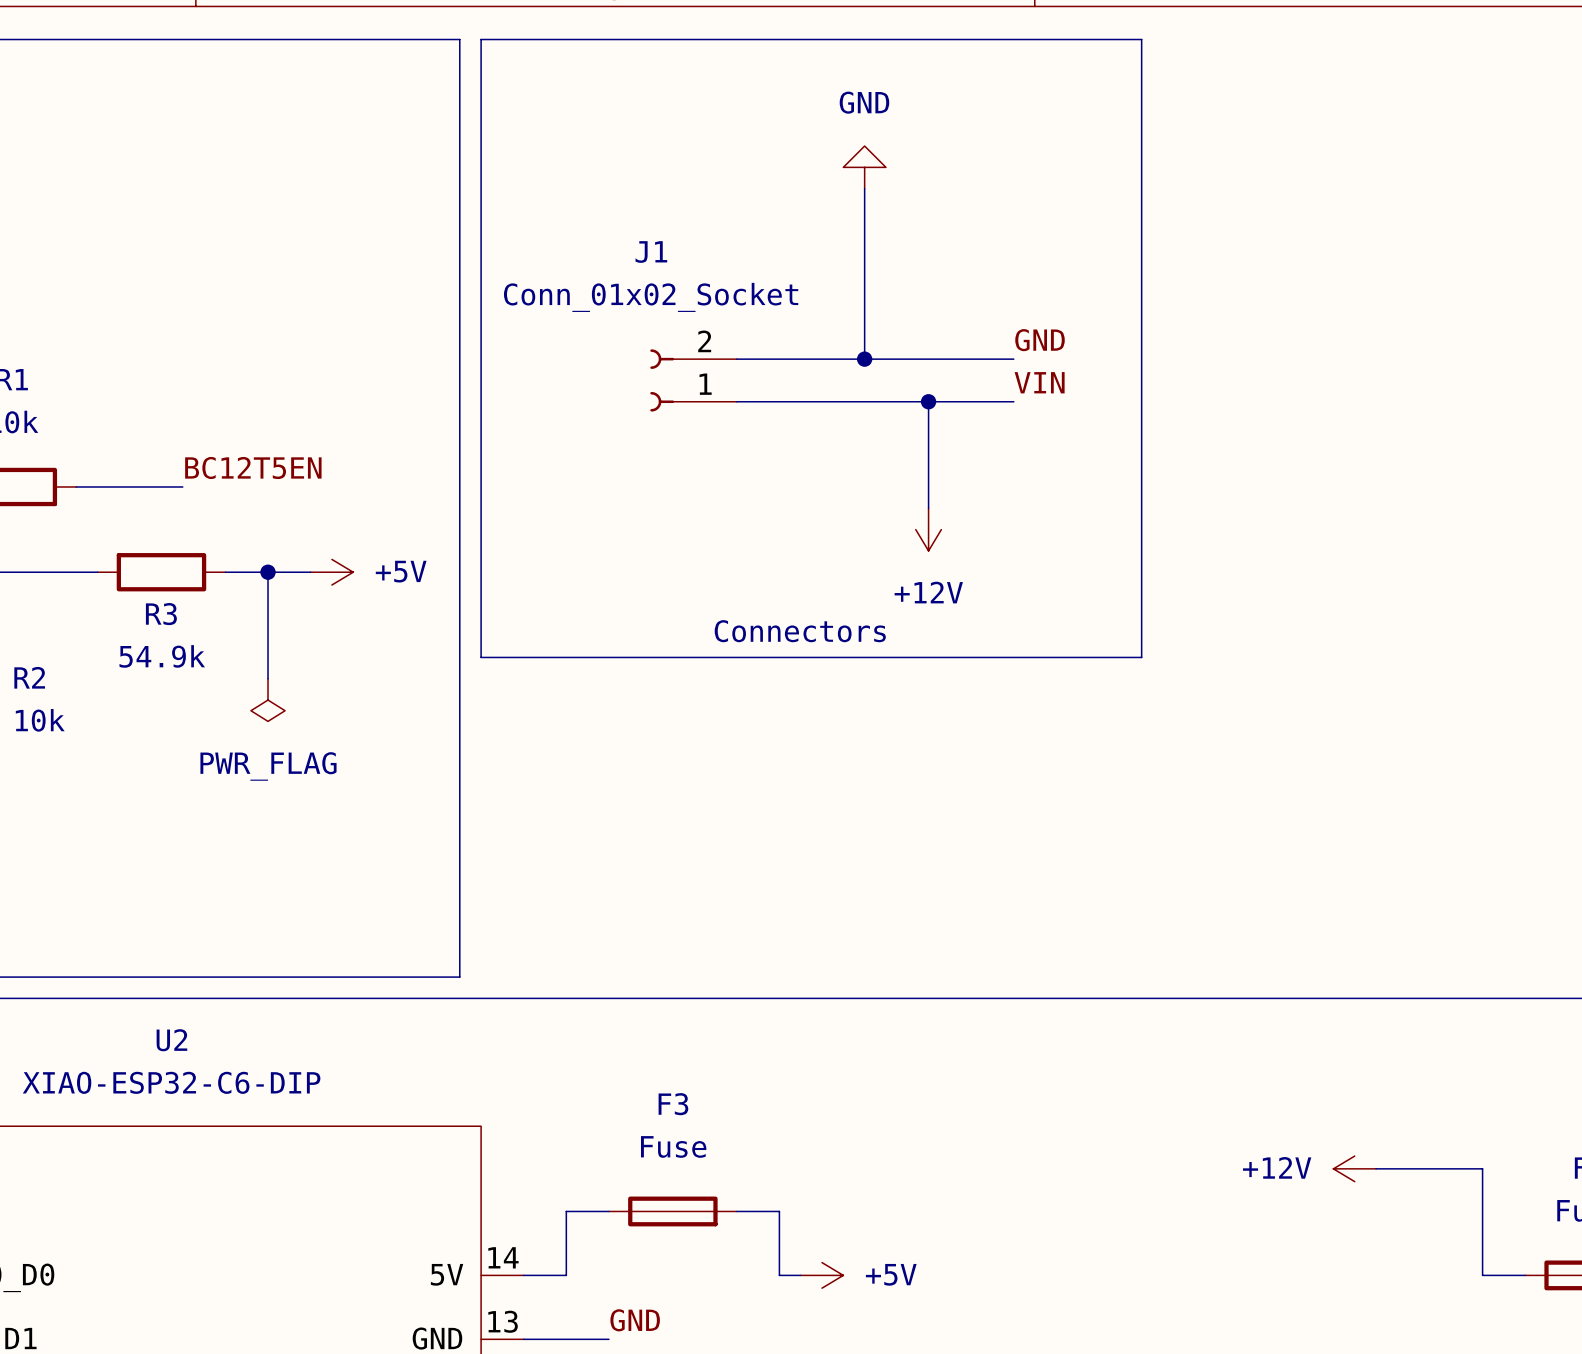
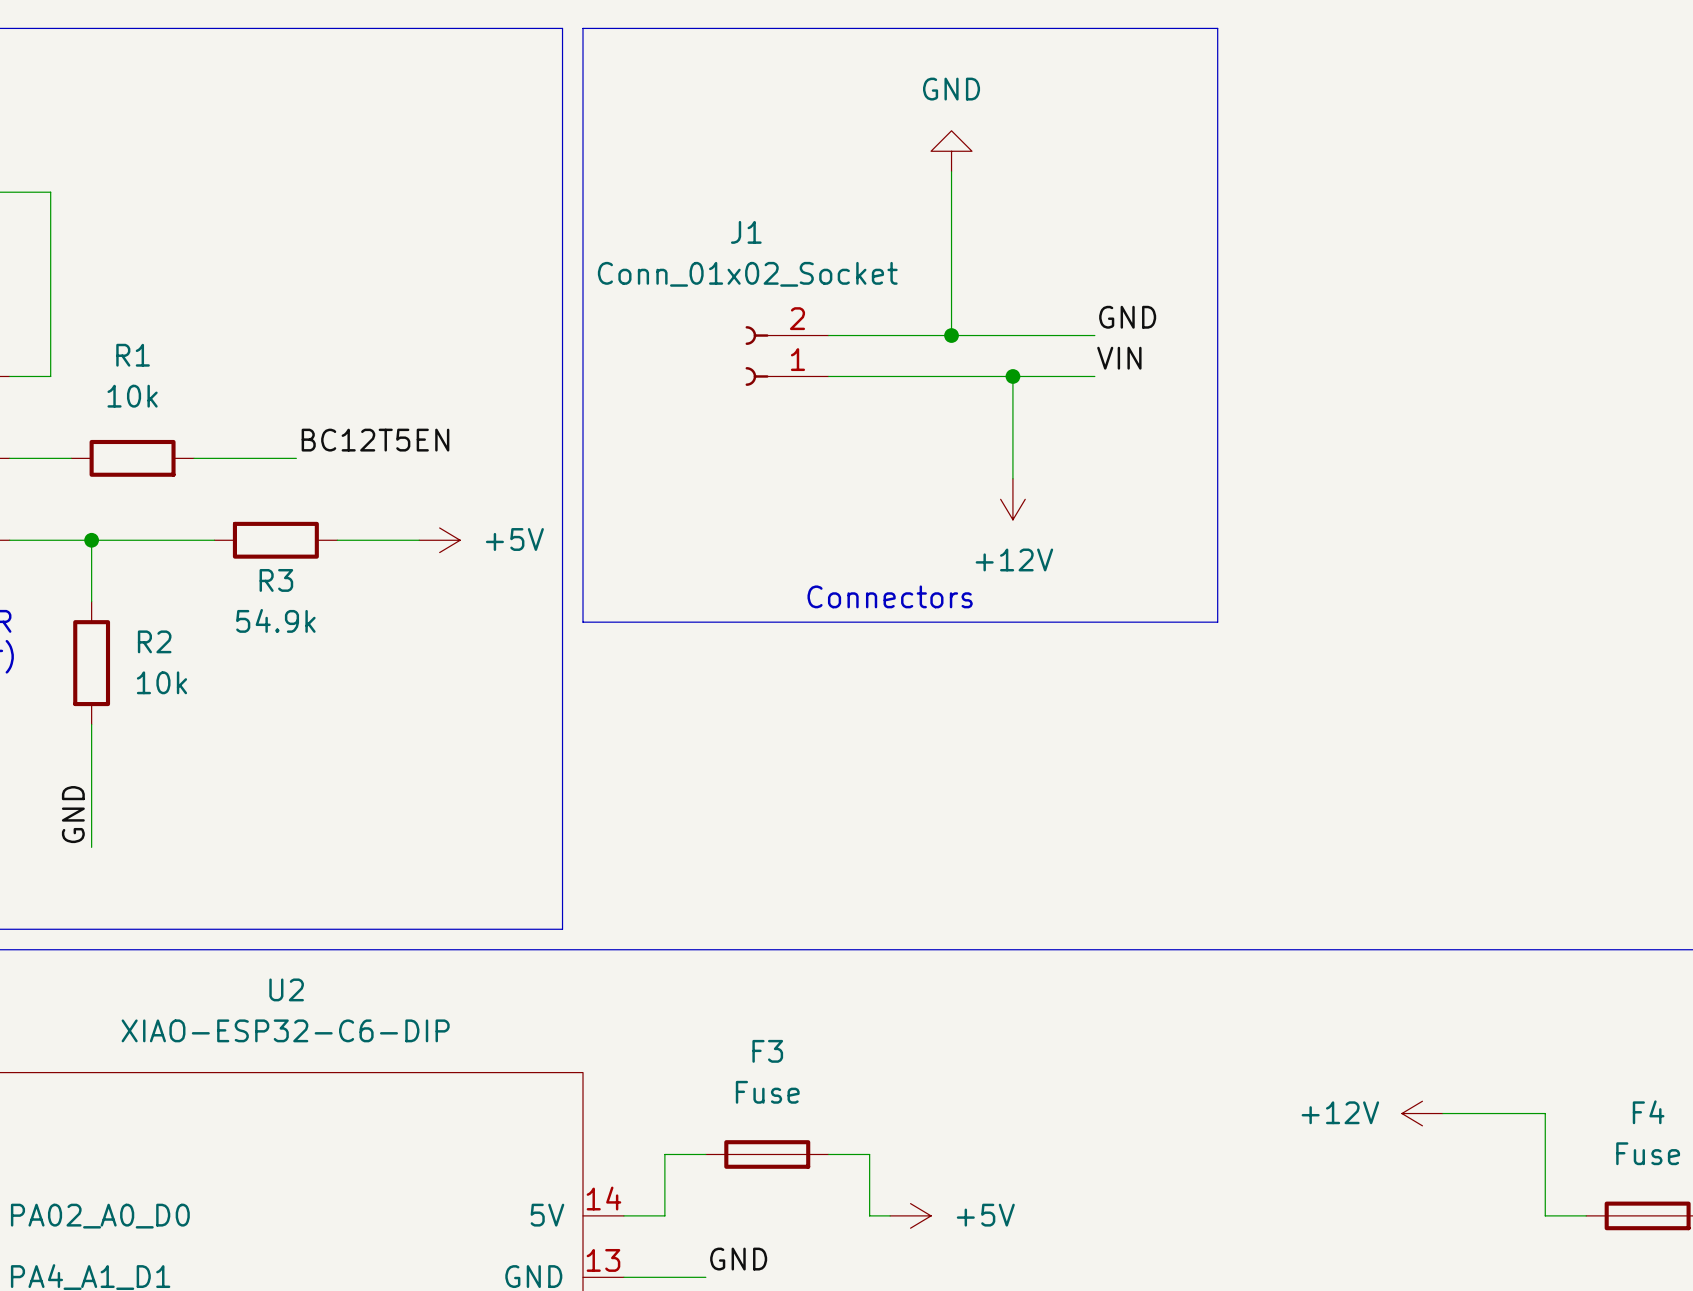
wire: (268, 572) (268, 678) -> none
junction: (268, 572) -> none
power symbol: PWR_FLAG (268, 700) -> none

